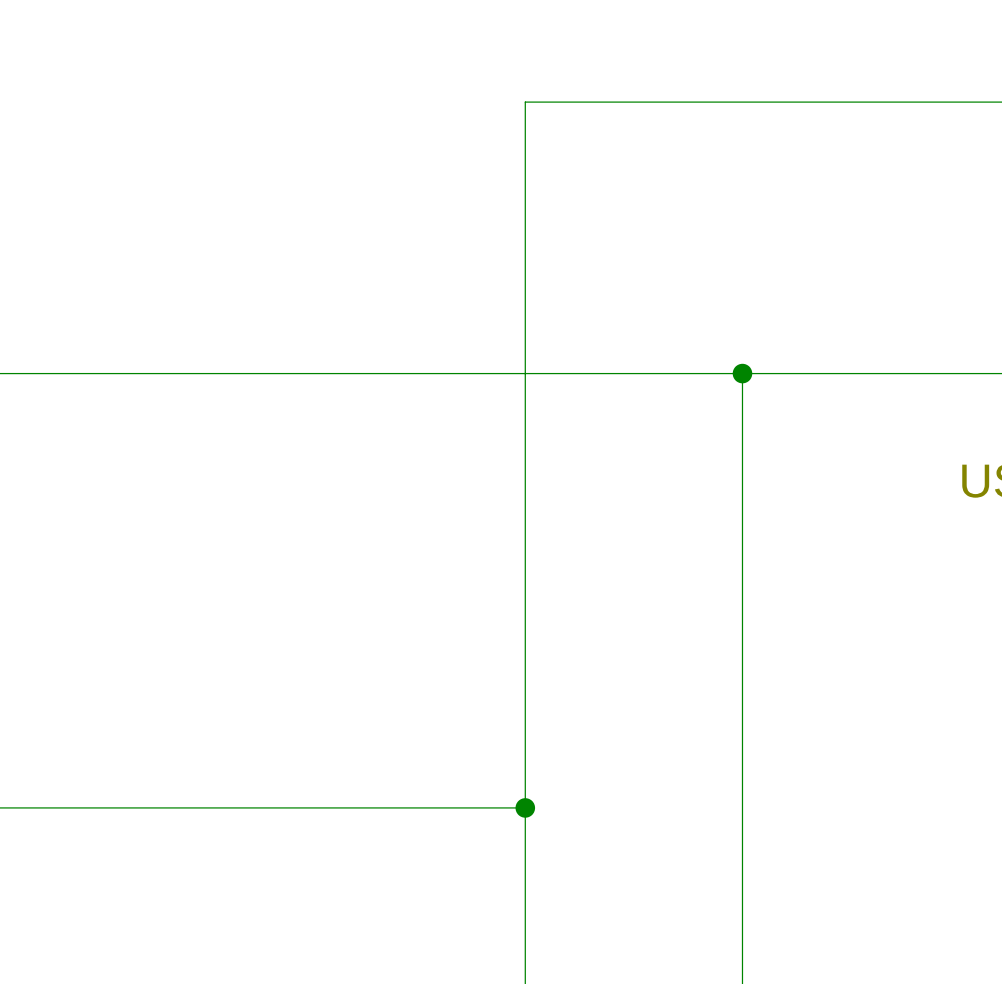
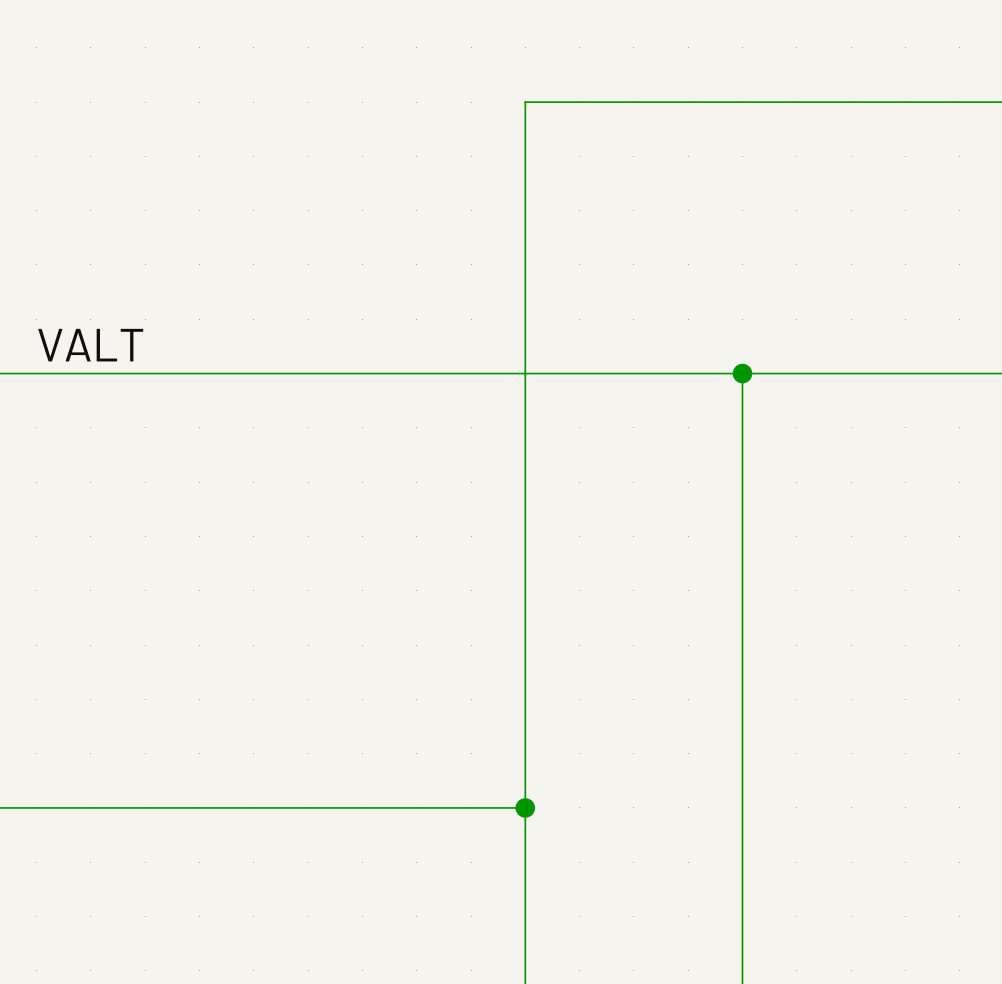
label: none -> VALT (90, 345)

